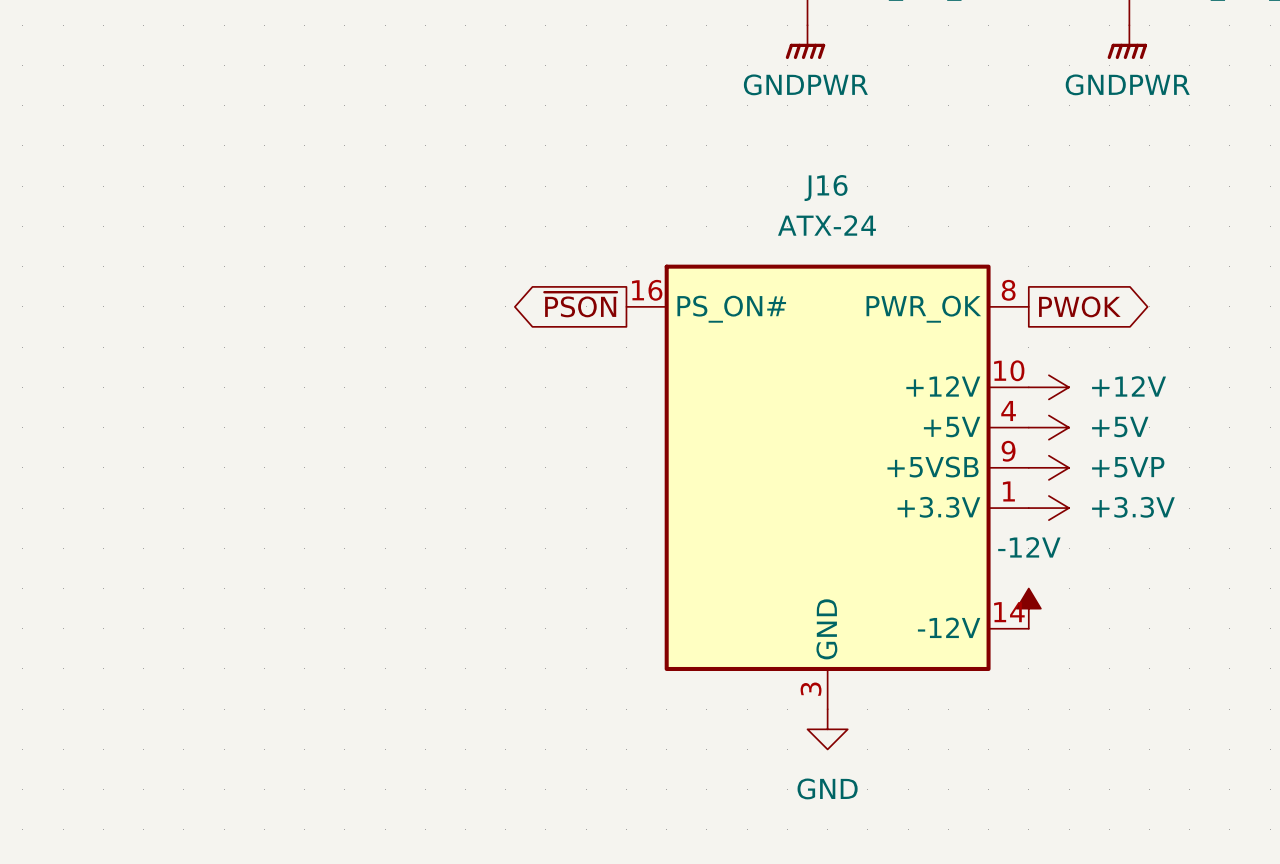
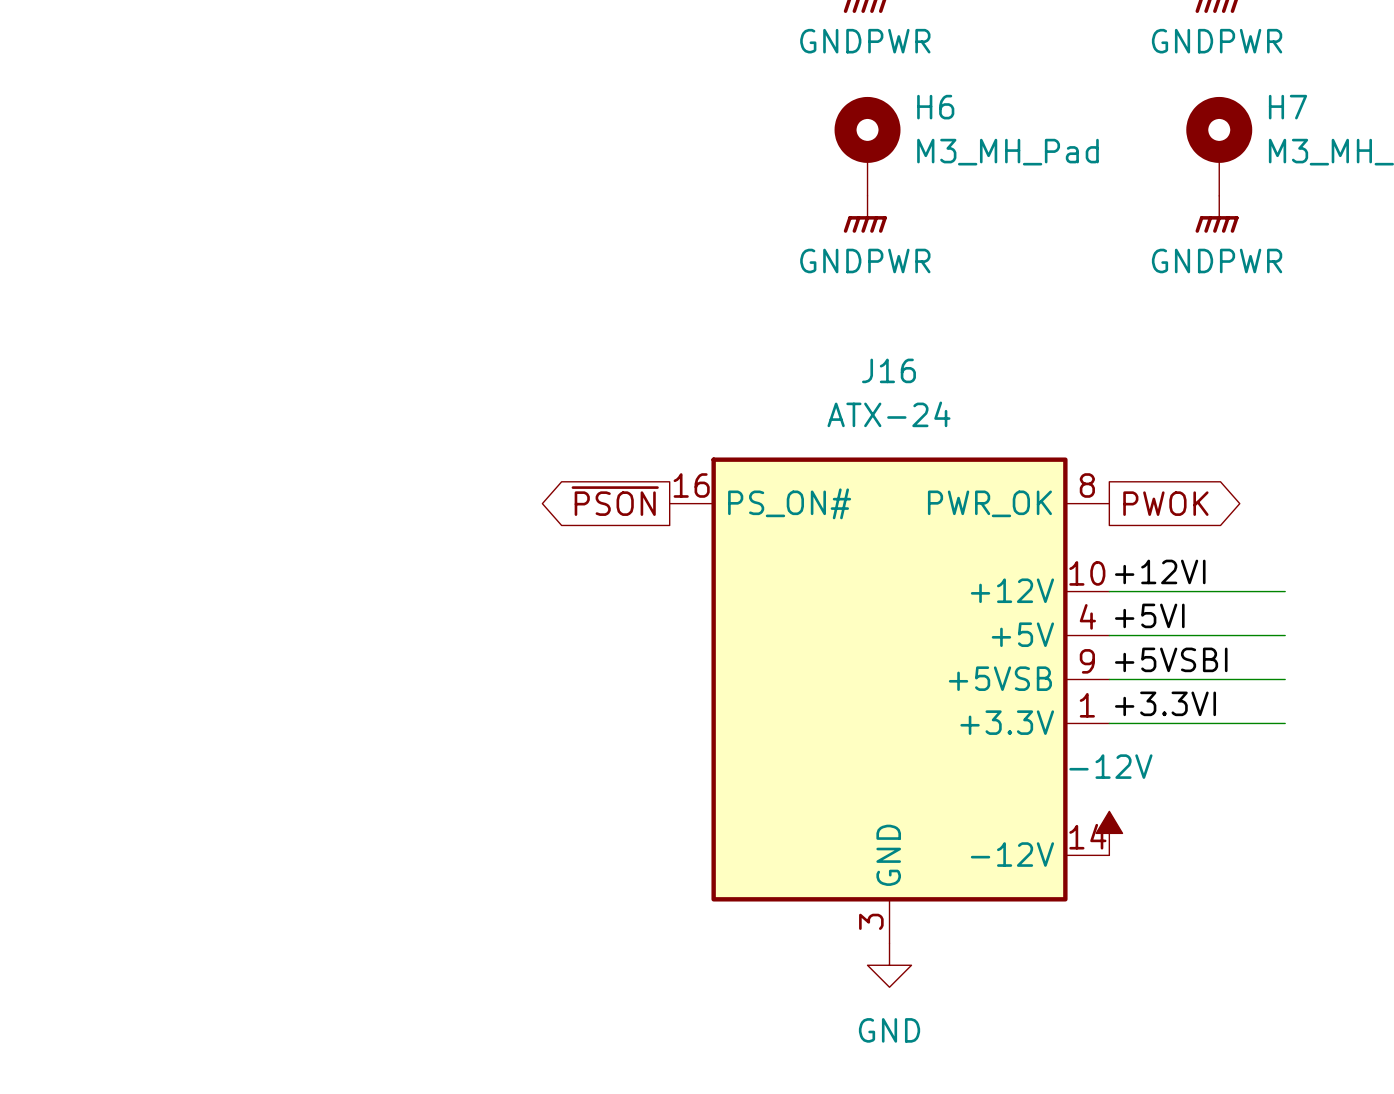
label: none -> +12VI (1160, 571)
wire: none -> (1109, 591) (1285, 591)
power symbol: +12V (1048, 387) -> none
label: none -> +5VI (1149, 615)
wire: none -> (1109, 635) (1285, 635)
power symbol: +5V (1048, 427) -> none
label: none -> +5VSBI (1171, 659)
wire: none -> (1109, 679) (1285, 679)
power symbol: +5VP (1048, 467) -> none
label: none -> +3.3VI (1165, 703)
wire: none -> (1109, 723) (1285, 723)
power symbol: +3.3V (1048, 508) -> none

